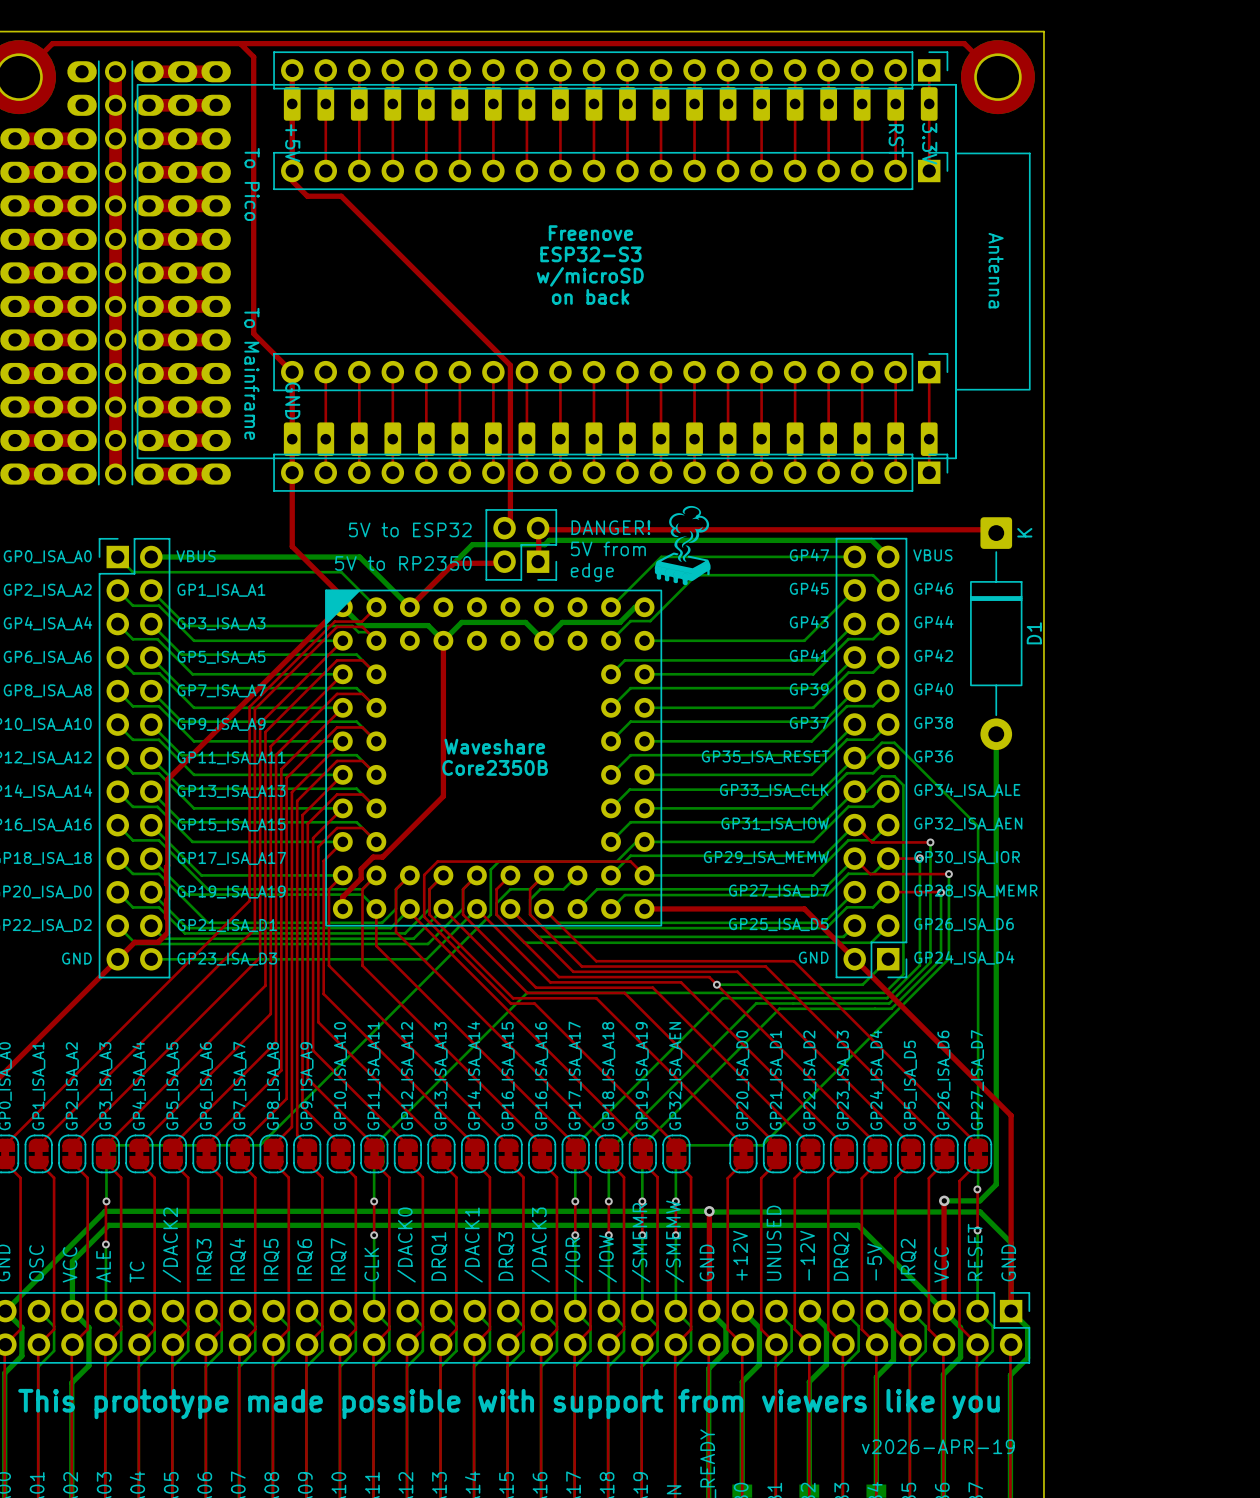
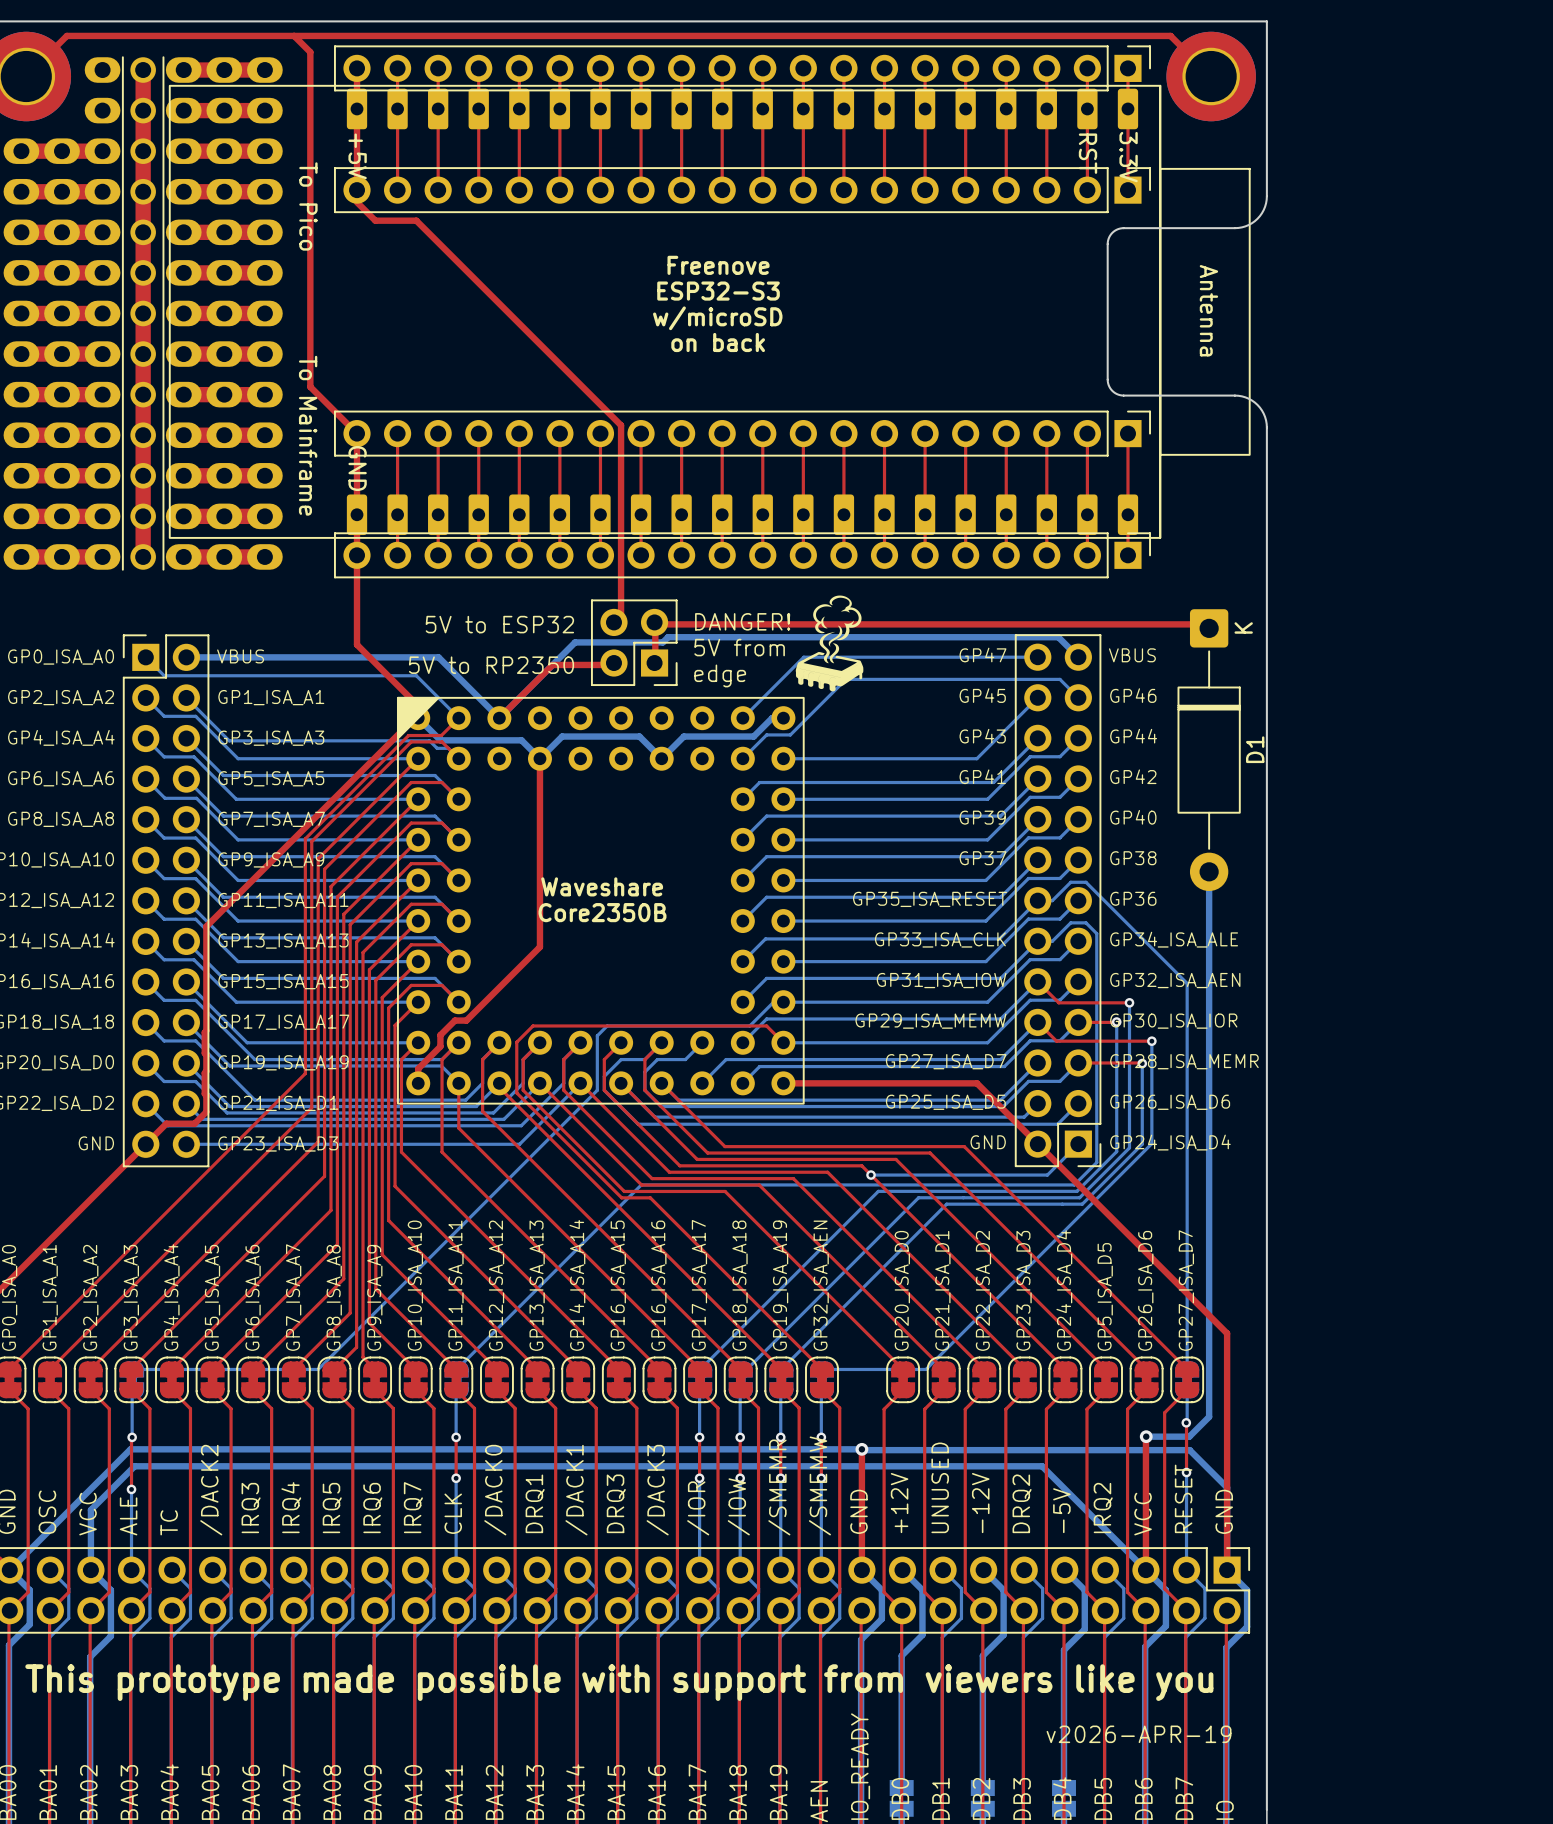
board edge: (1043, 176) (1043, 367) -> (1266, 196) (1261, 213) (1254, 221) (1245, 226) (1234, 228) (1121, 228) (1112, 232) (1107, 244) (1107, 379) (1111, 389) (1116, 393) (1123, 395) (1242, 396) (1251, 400) (1259, 407) (1265, 416) (1266, 427)

